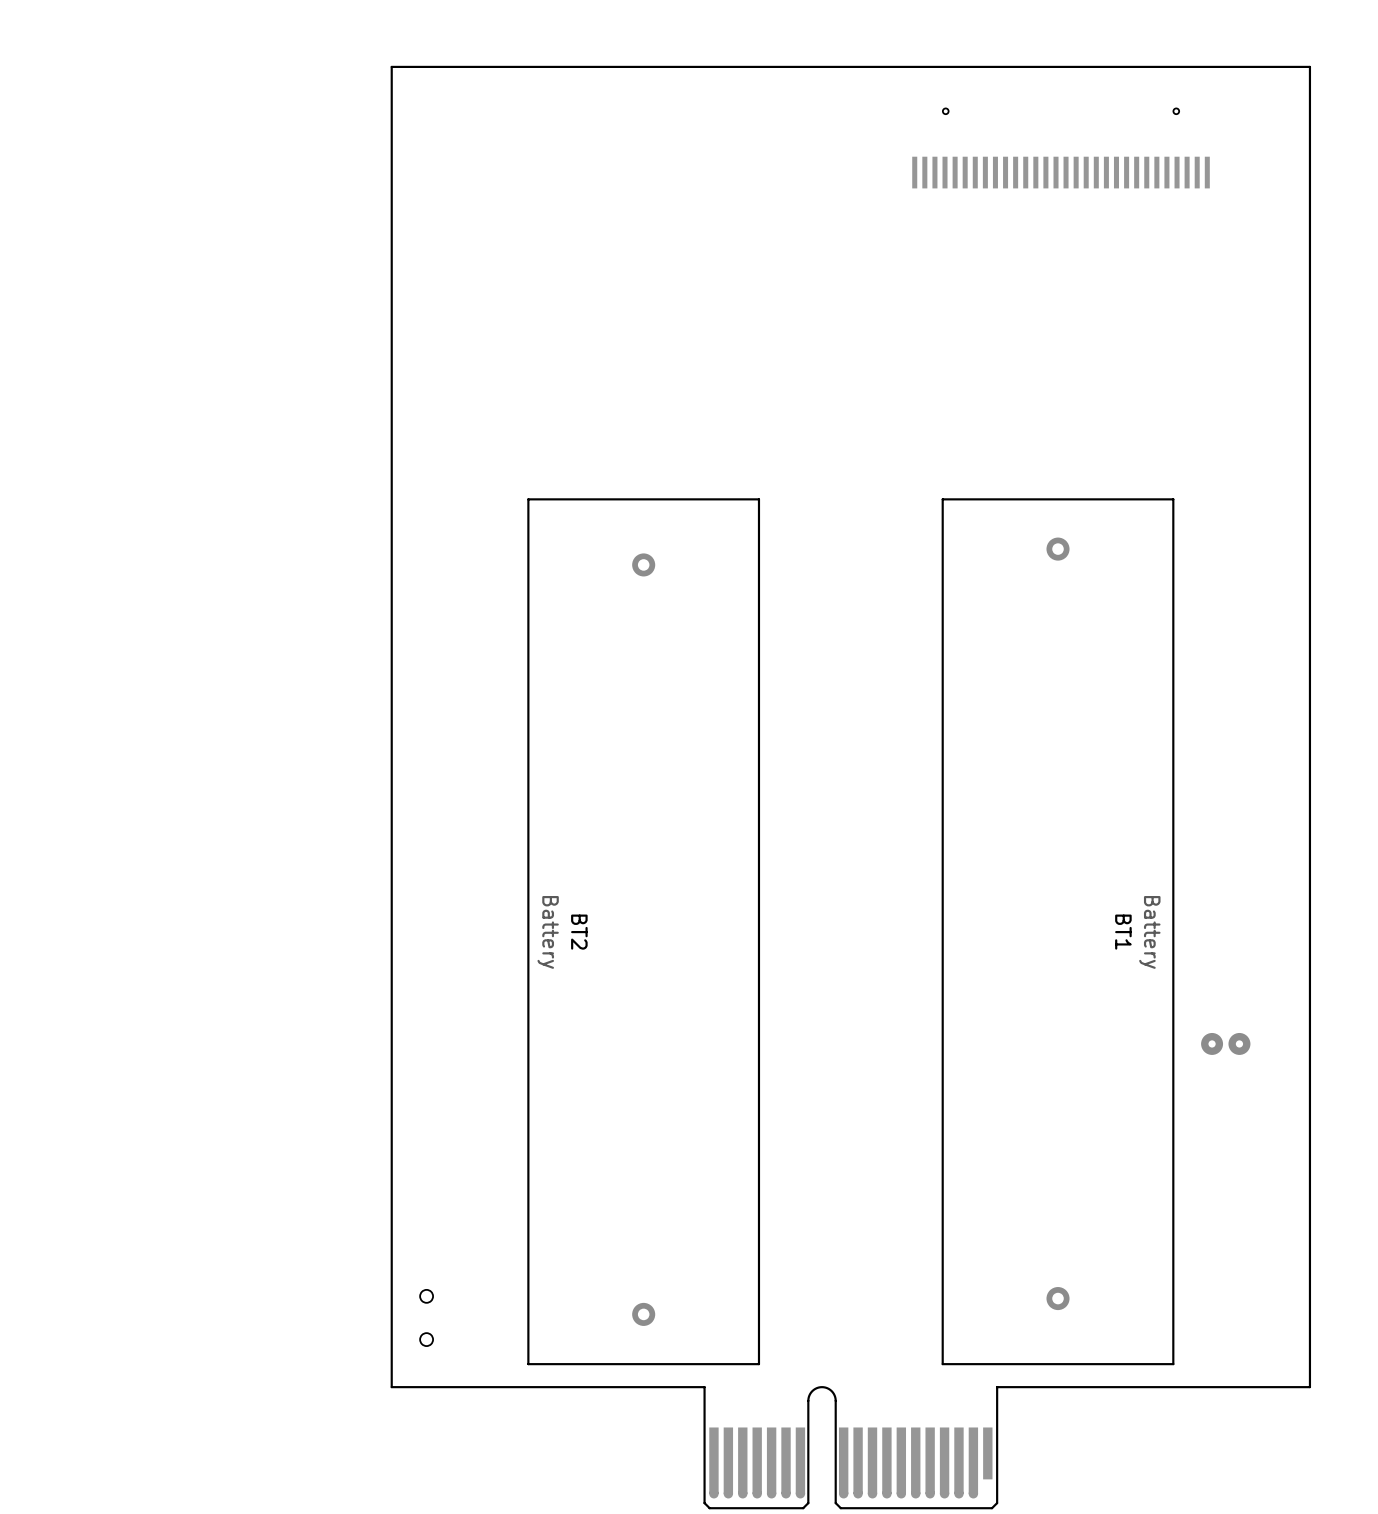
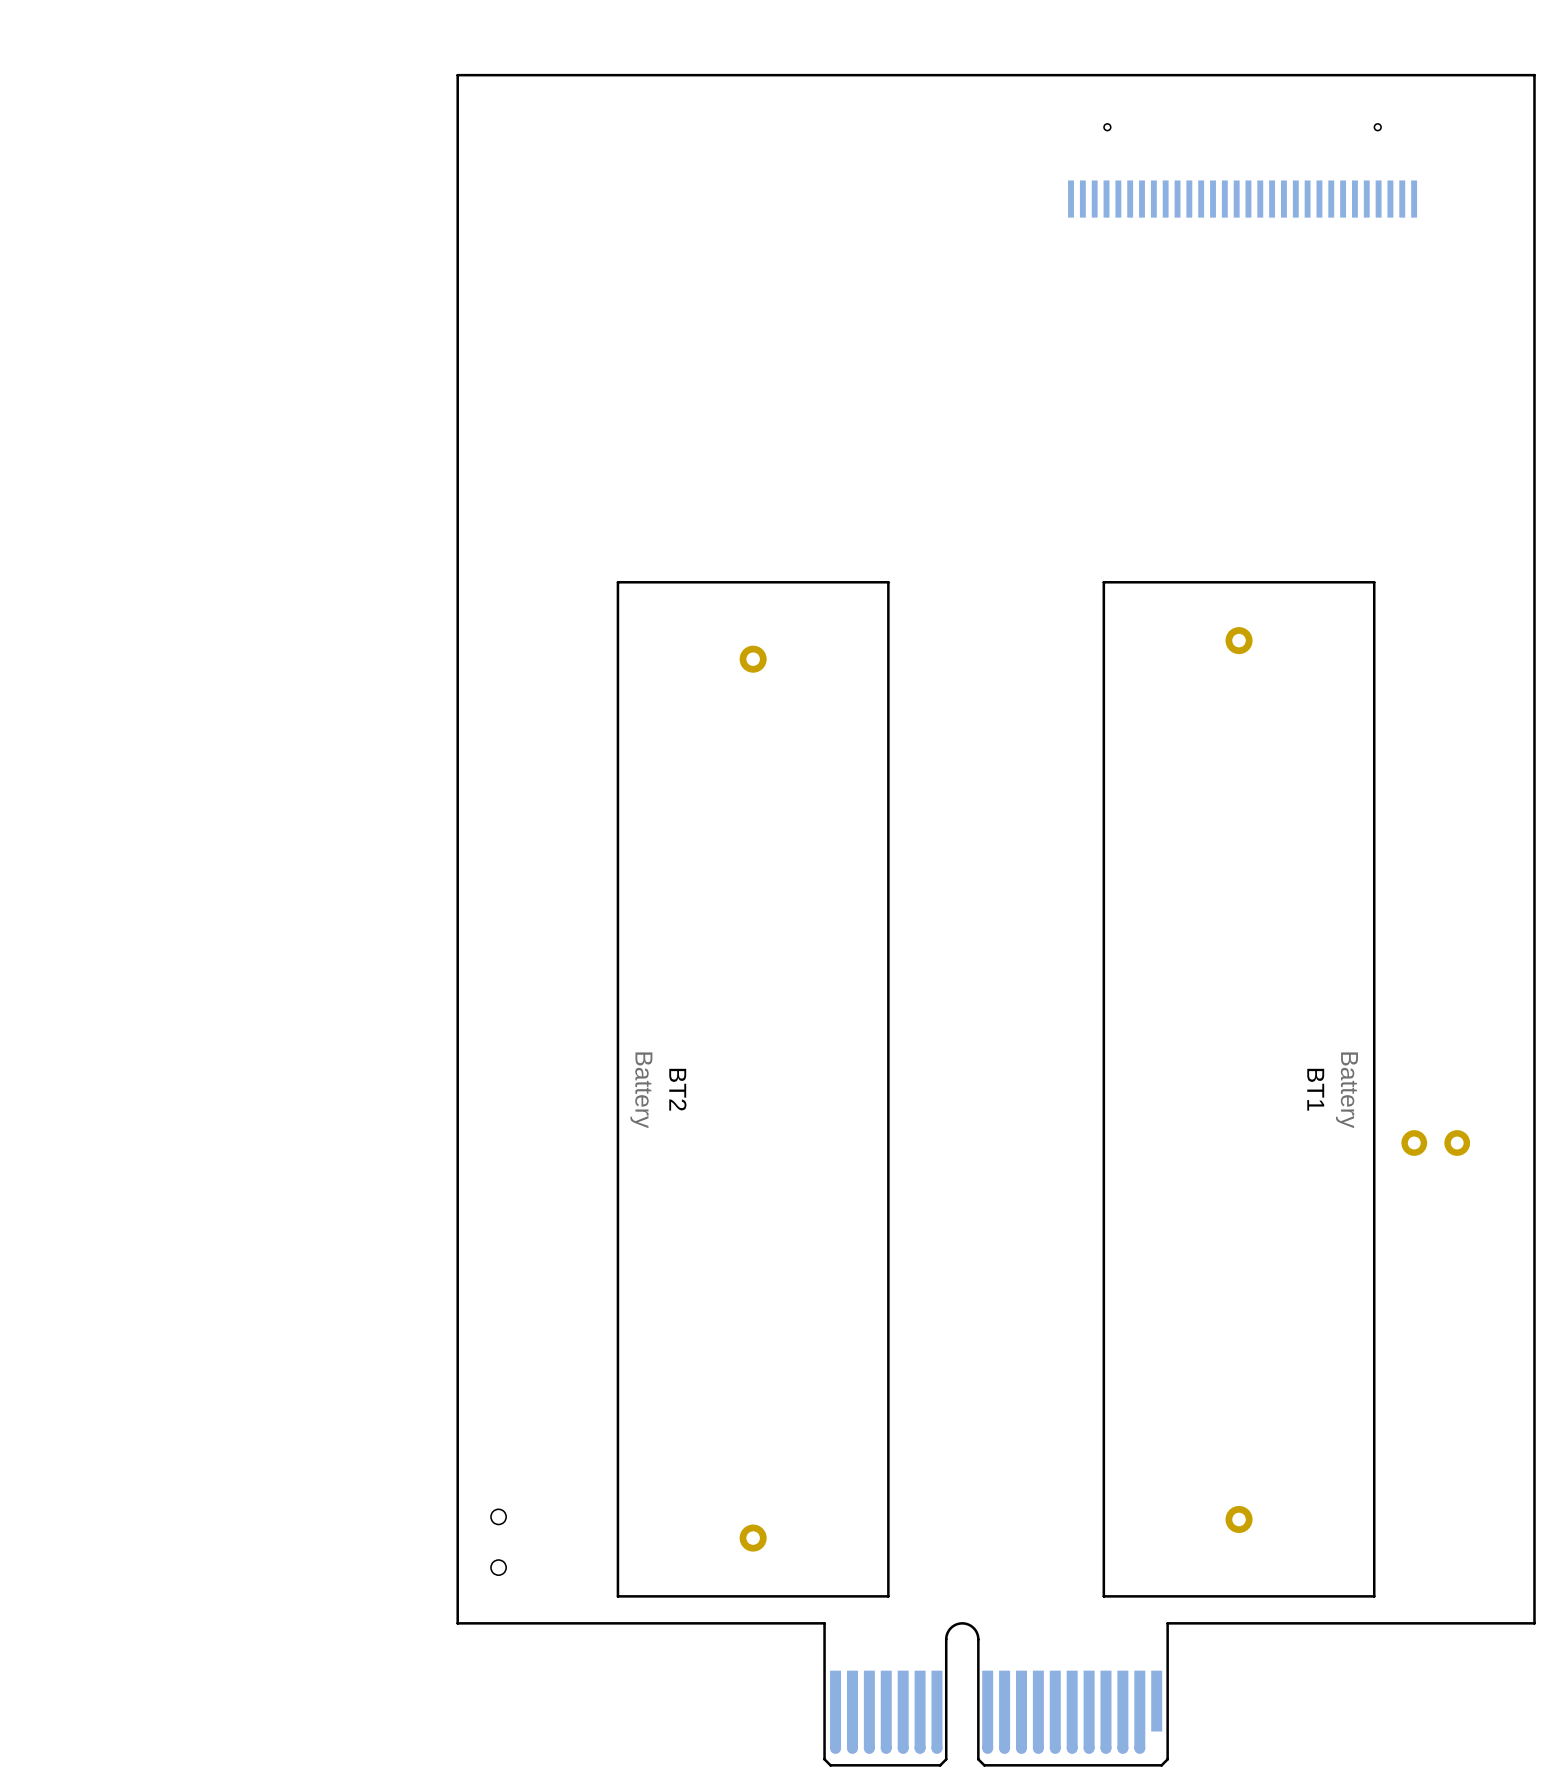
part: none -> (1435, 1142)
part: (1225, 1043) -> none

